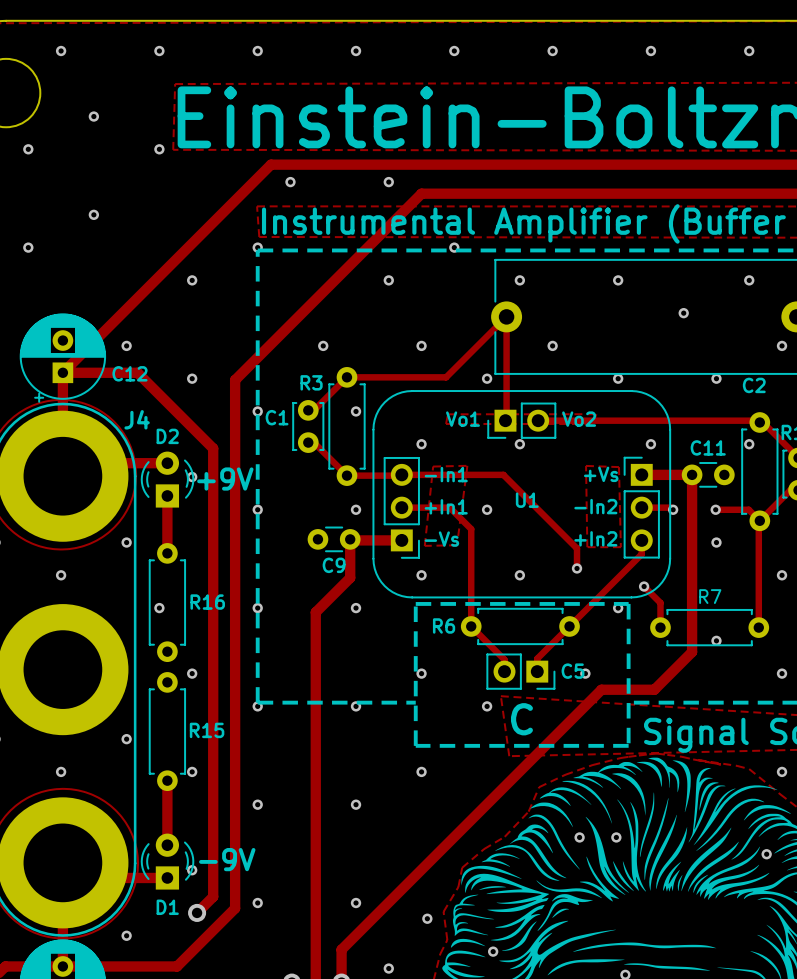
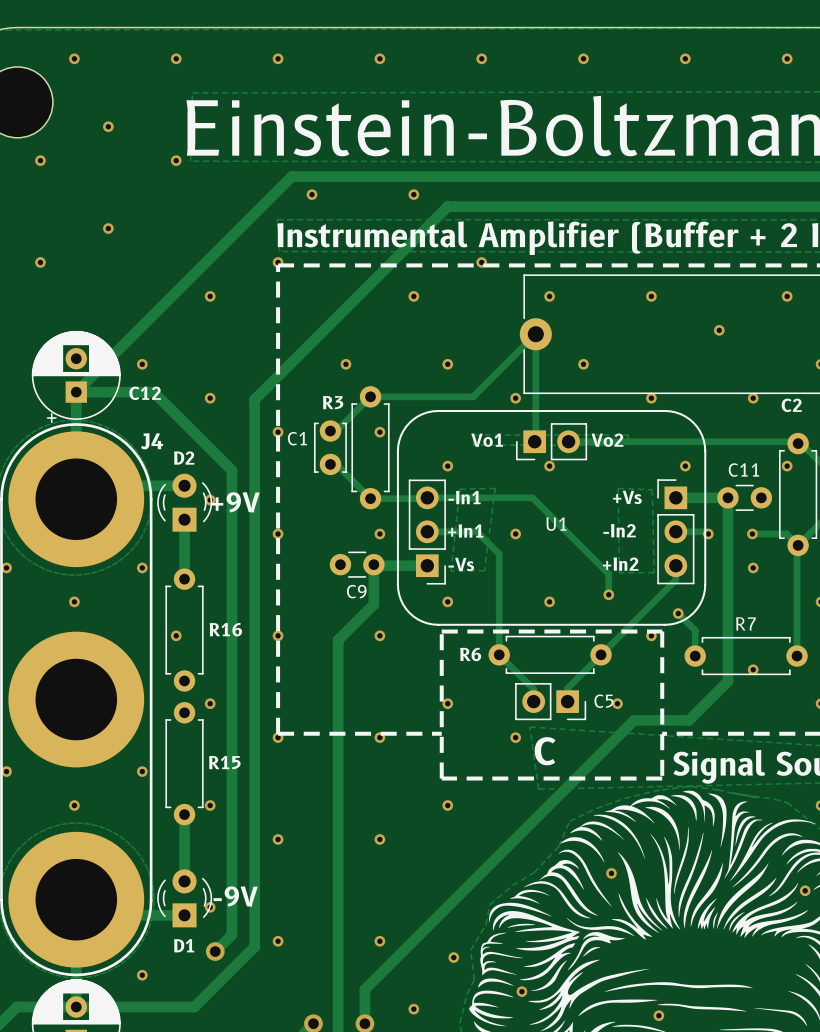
via: (616, 837) -> none

